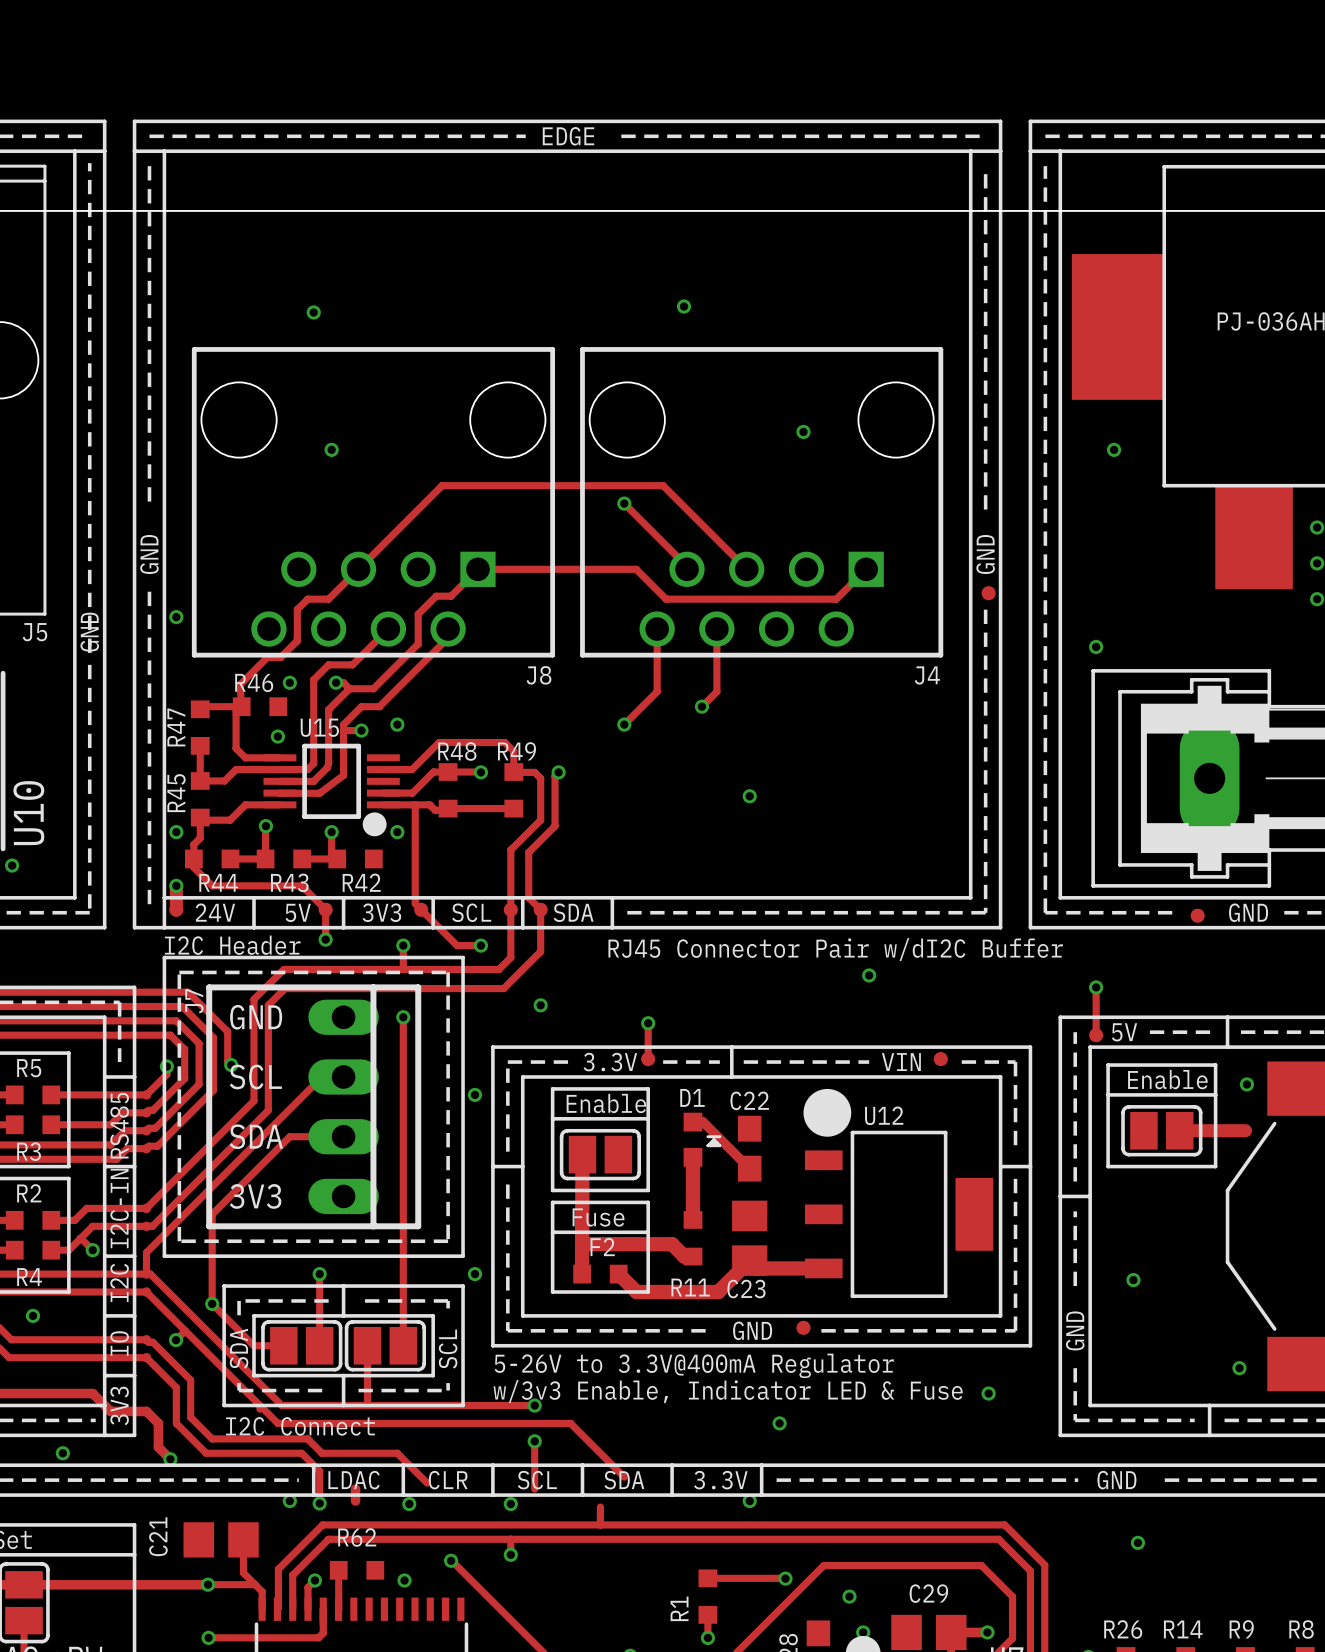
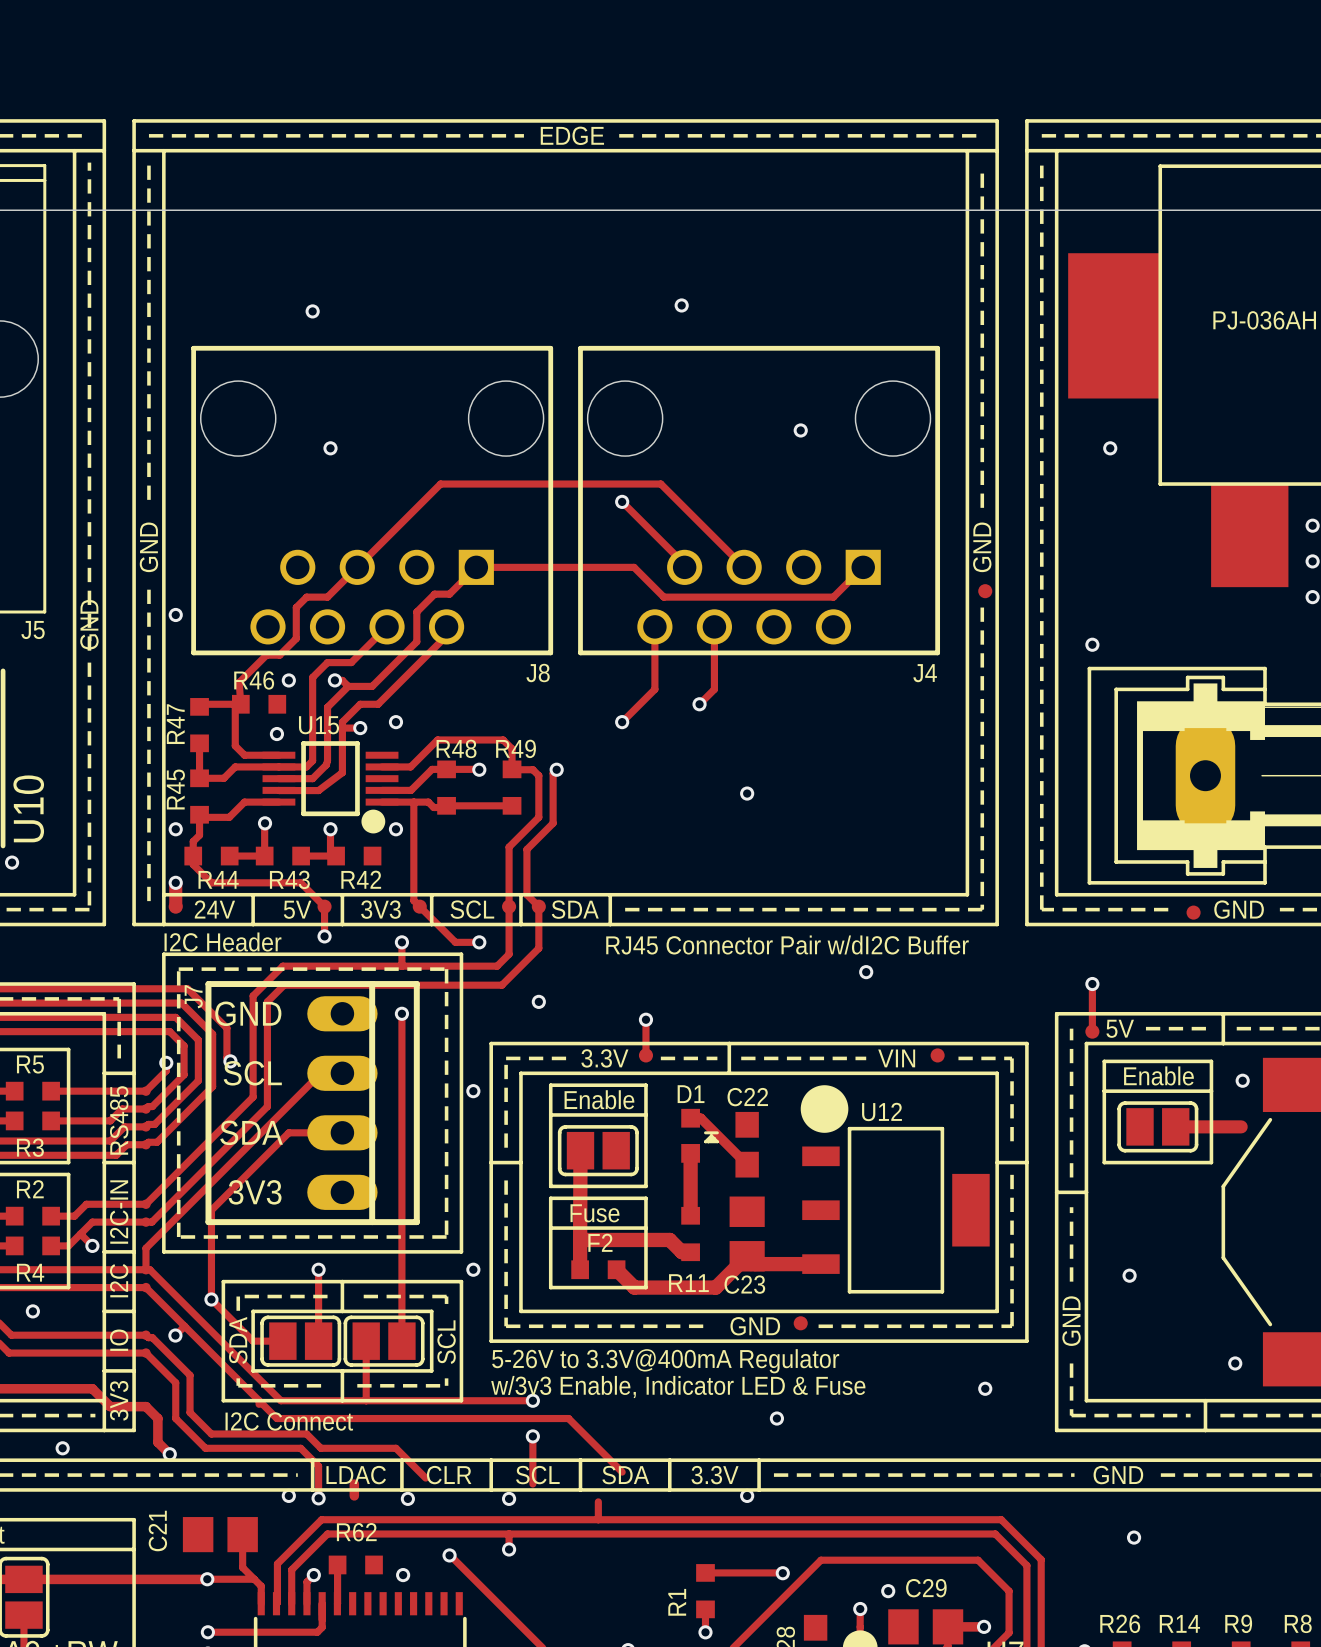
via: (849, 1596) -> none
via: none -> (888, 1591)
track: none -> (860, 1609) (860, 1626)
via: none -> (860, 1609)
via: (863, 1632) -> none

